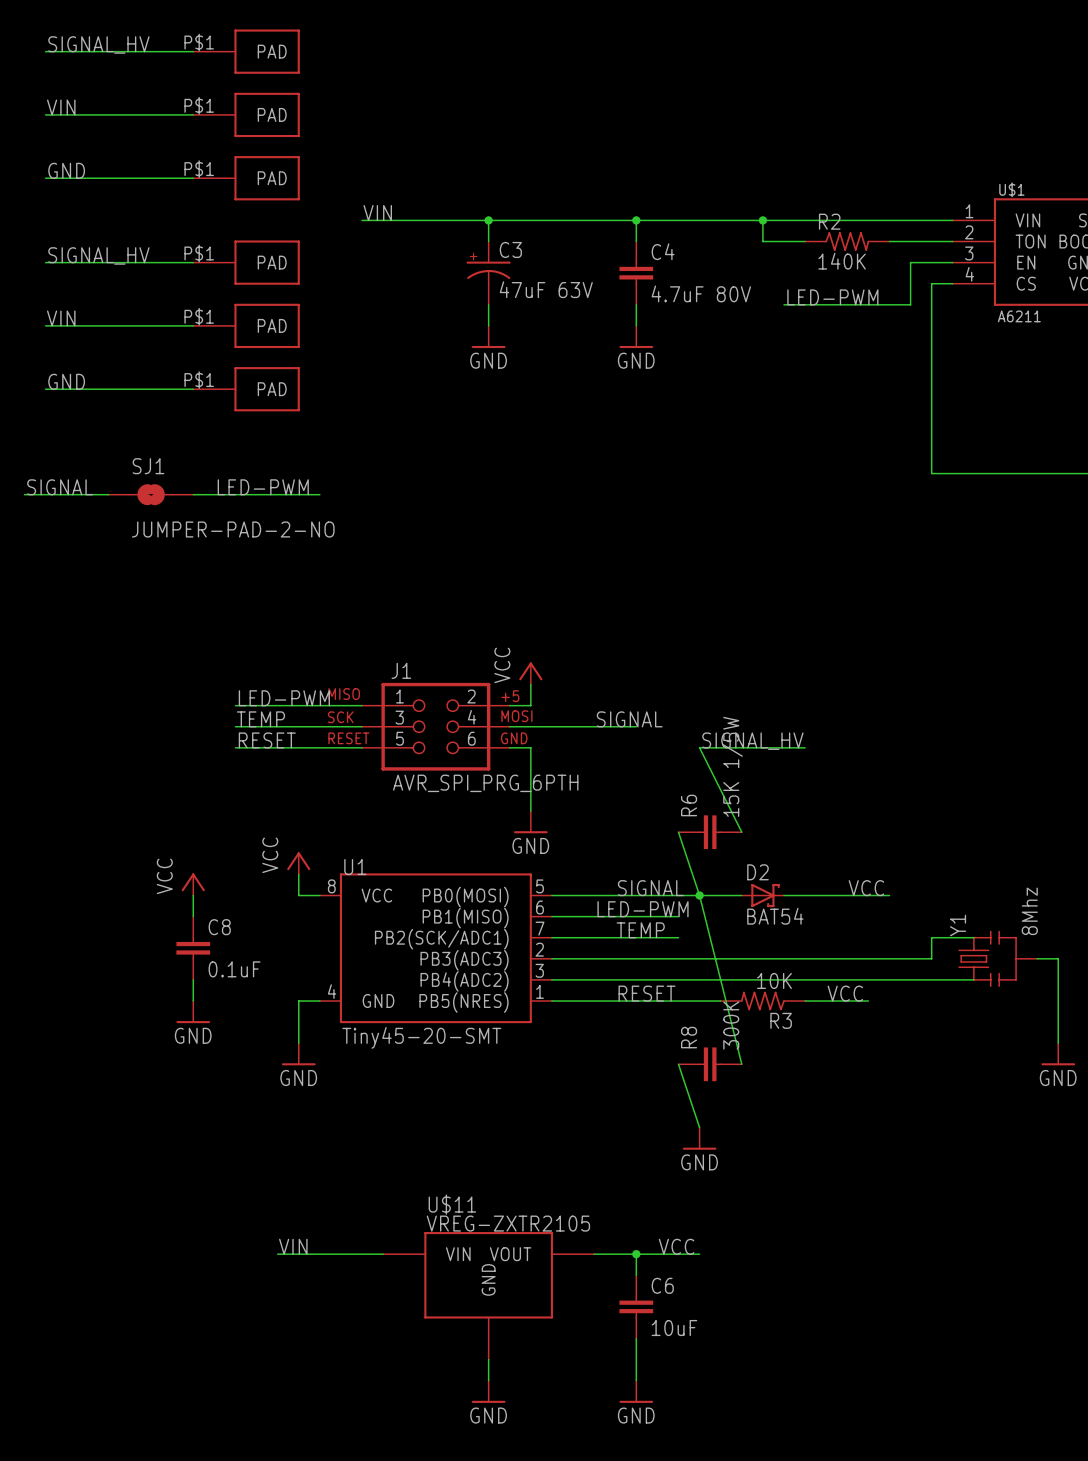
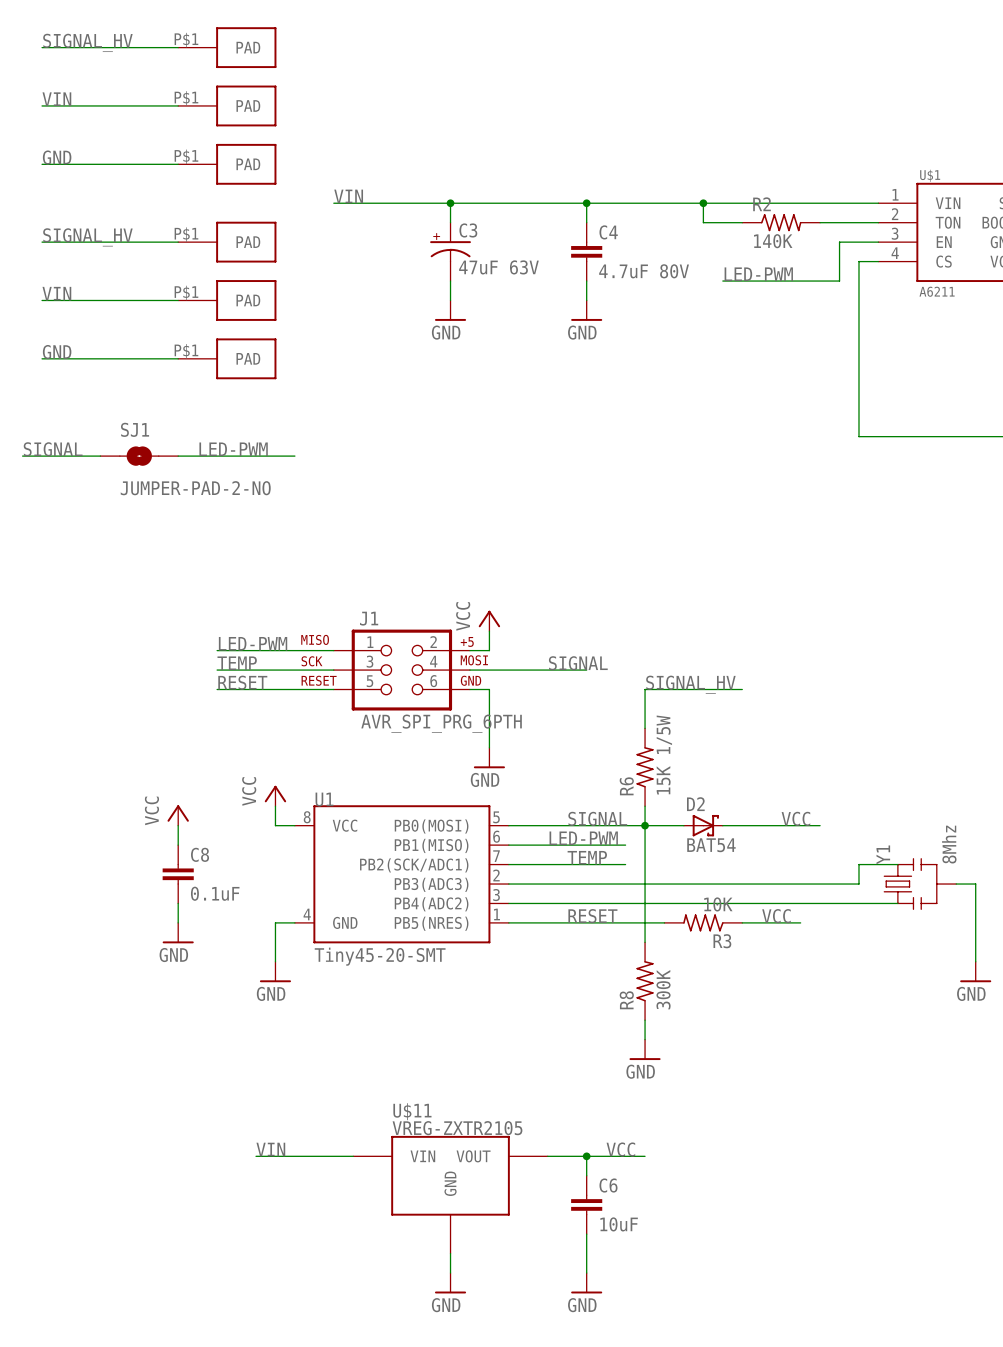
wire: (699, 747) (741, 832) -> (645, 689) (645, 728)
R6 value position: 15K 1/5W (732, 766) -> 15K 1/5W (664, 755)
R6 name position: R6 (689, 805) -> R6 (626, 786)
R6 symbol: [678, 815, 742, 850] -> [636, 728, 654, 807]
wire: (678, 832) (699, 895) (741, 1064) -> none
wire: none -> (645, 806) (645, 942)
R8 value position: 300K (731, 1025) -> 300K (663, 989)
R8 name position: R8 (689, 1037) -> R8 (626, 1000)
R8 symbol: [678, 1047, 742, 1082] -> [636, 942, 654, 1021]
wire: (678, 1064) (699, 1127) -> (645, 1020) (645, 1039)

